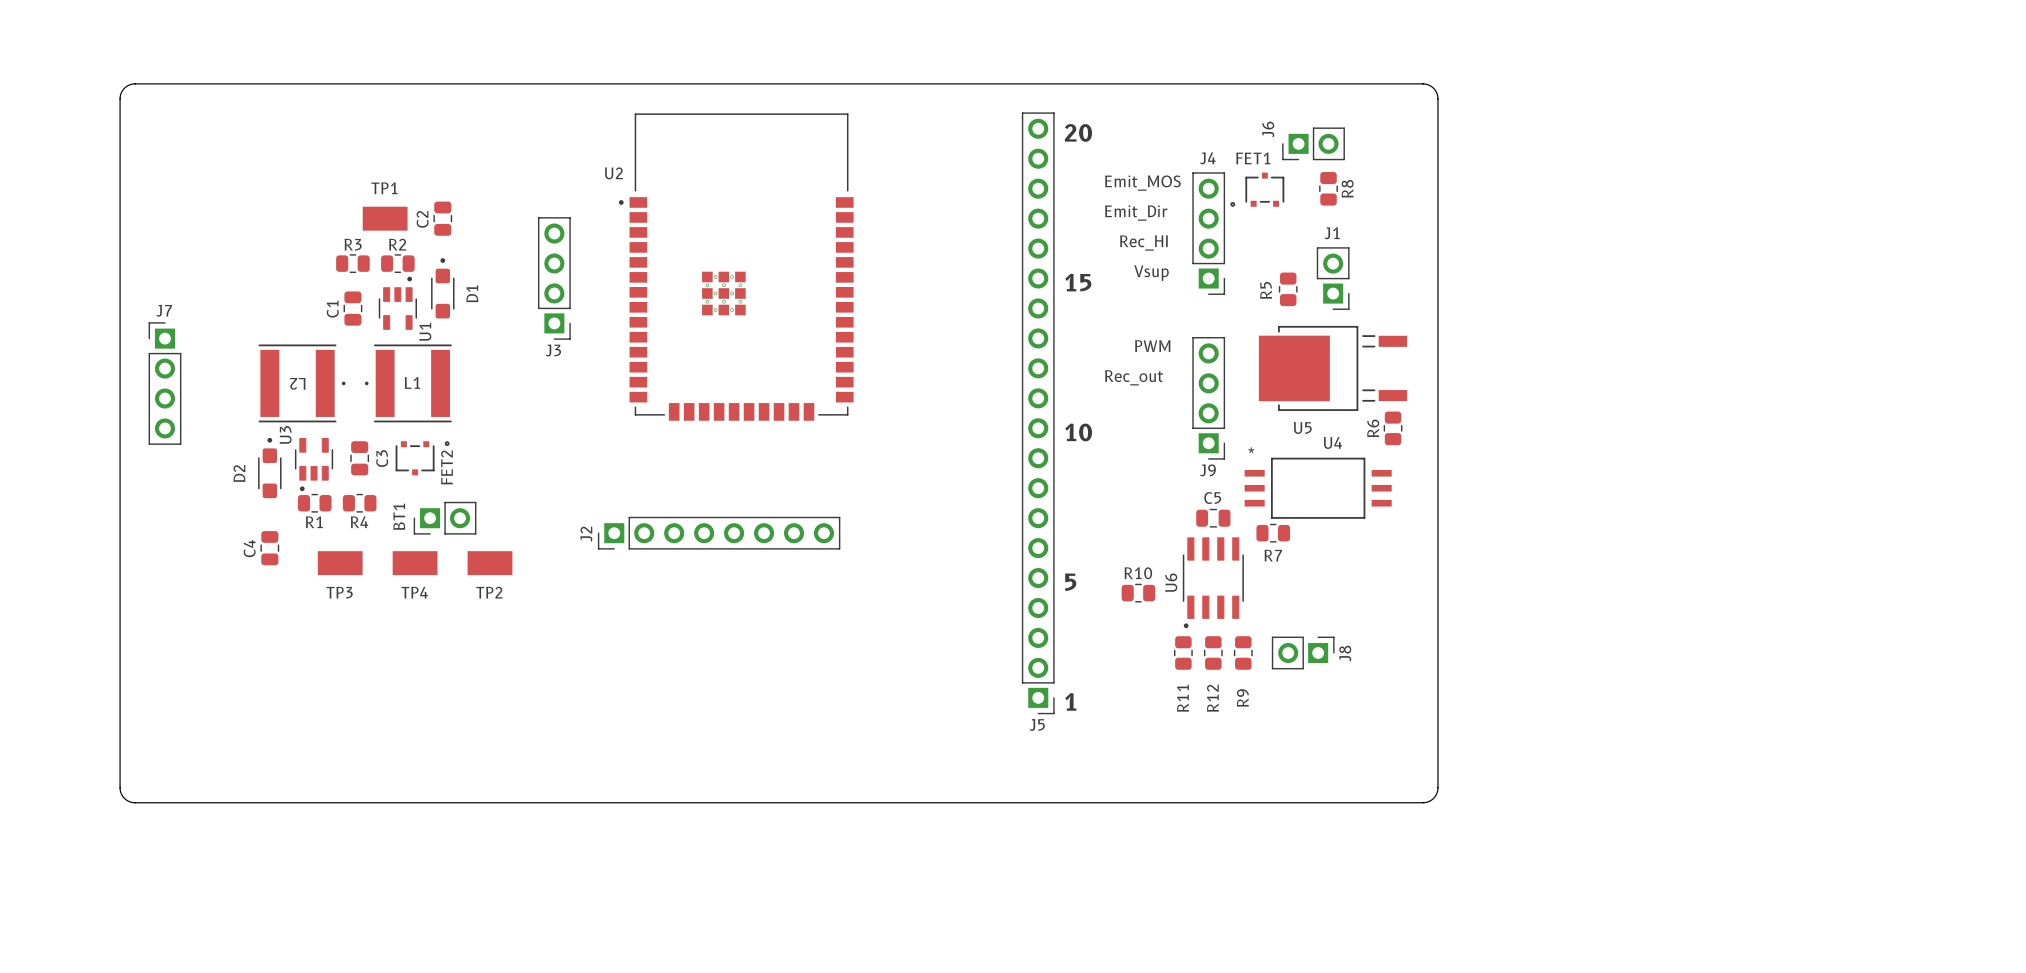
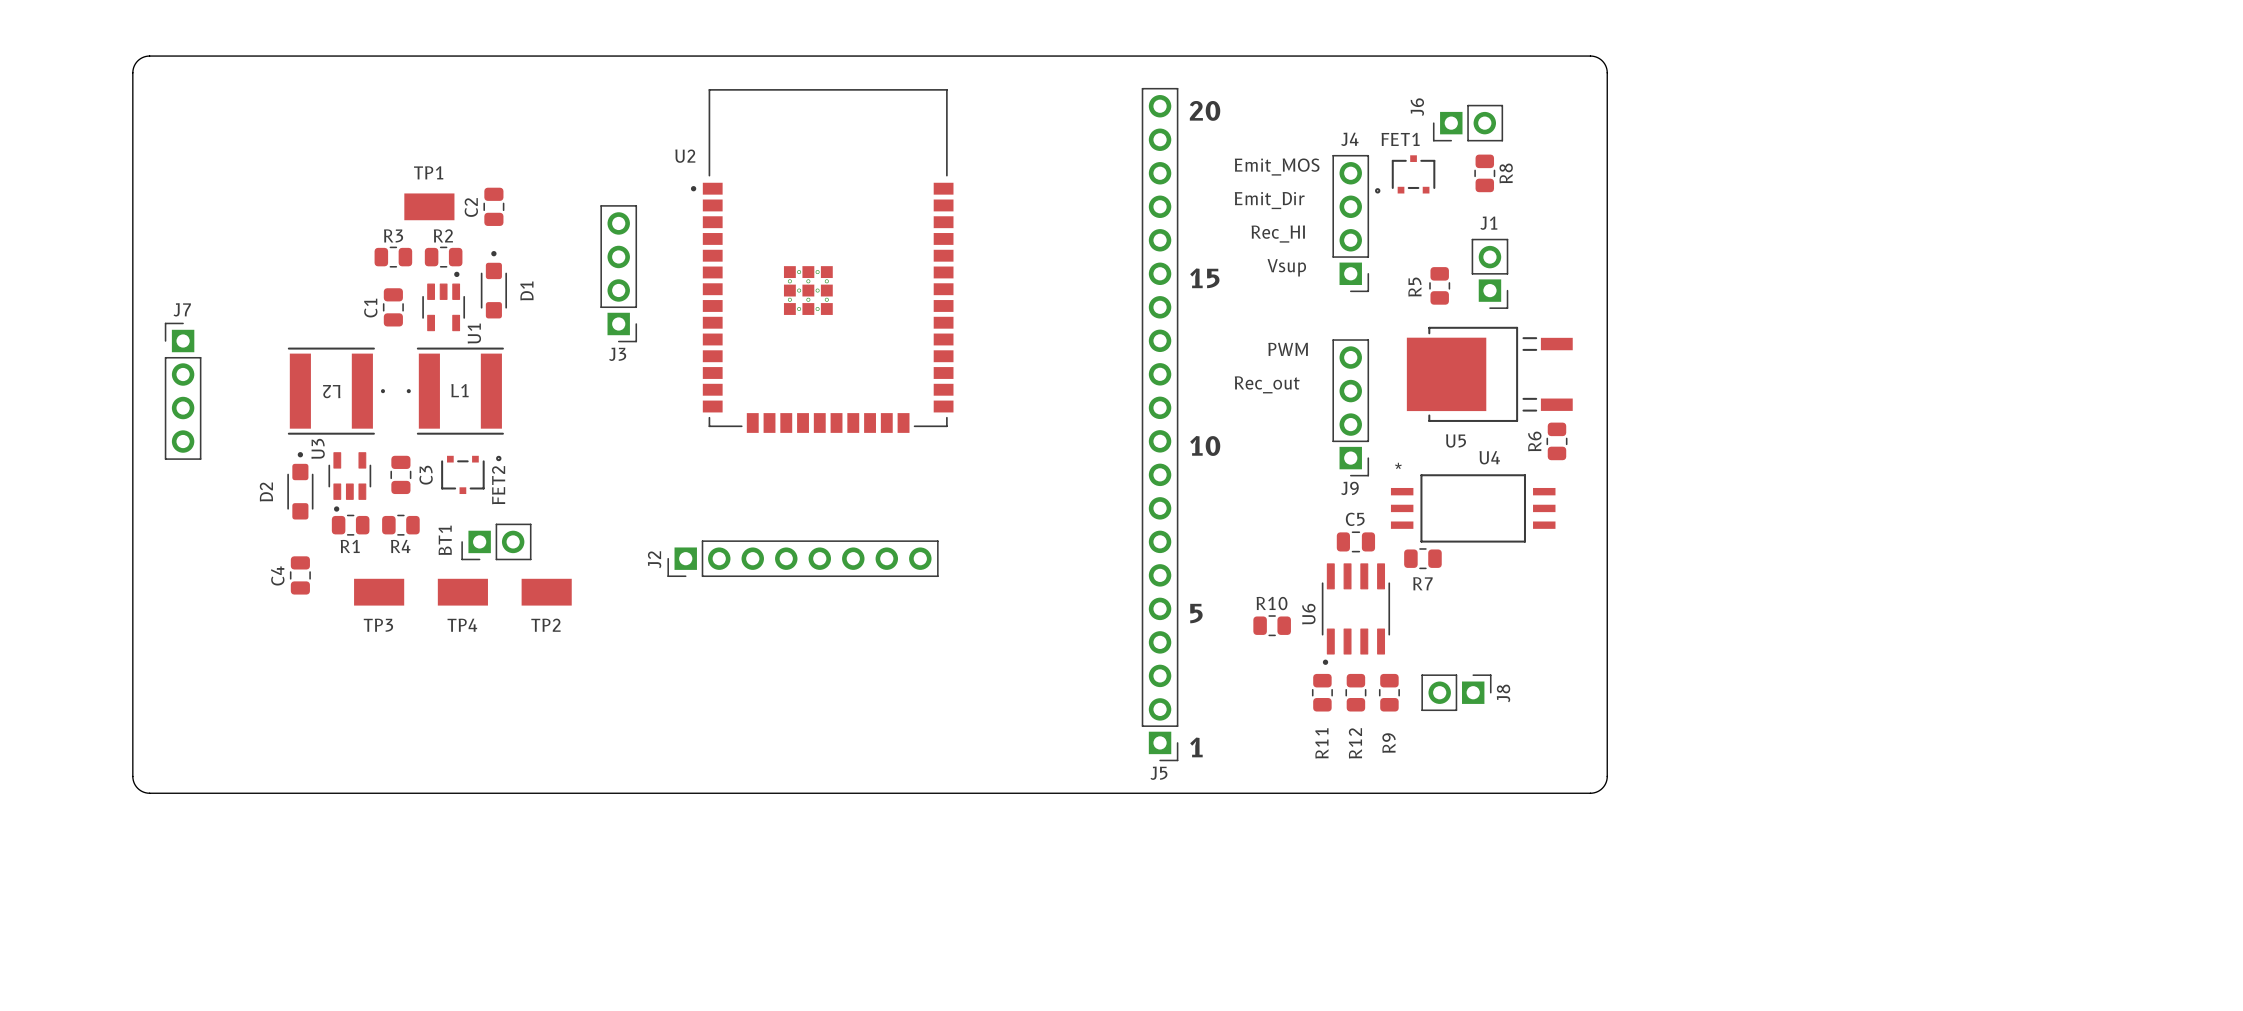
board edge: (120, 727) (120, 791) (125, 799) (135, 802) (1424, 802) (1433, 798) (1437, 791) (1437, 727) -> (132, 776) (137, 788) (149, 793) (1590, 793) (1602, 788) (1607, 776)

